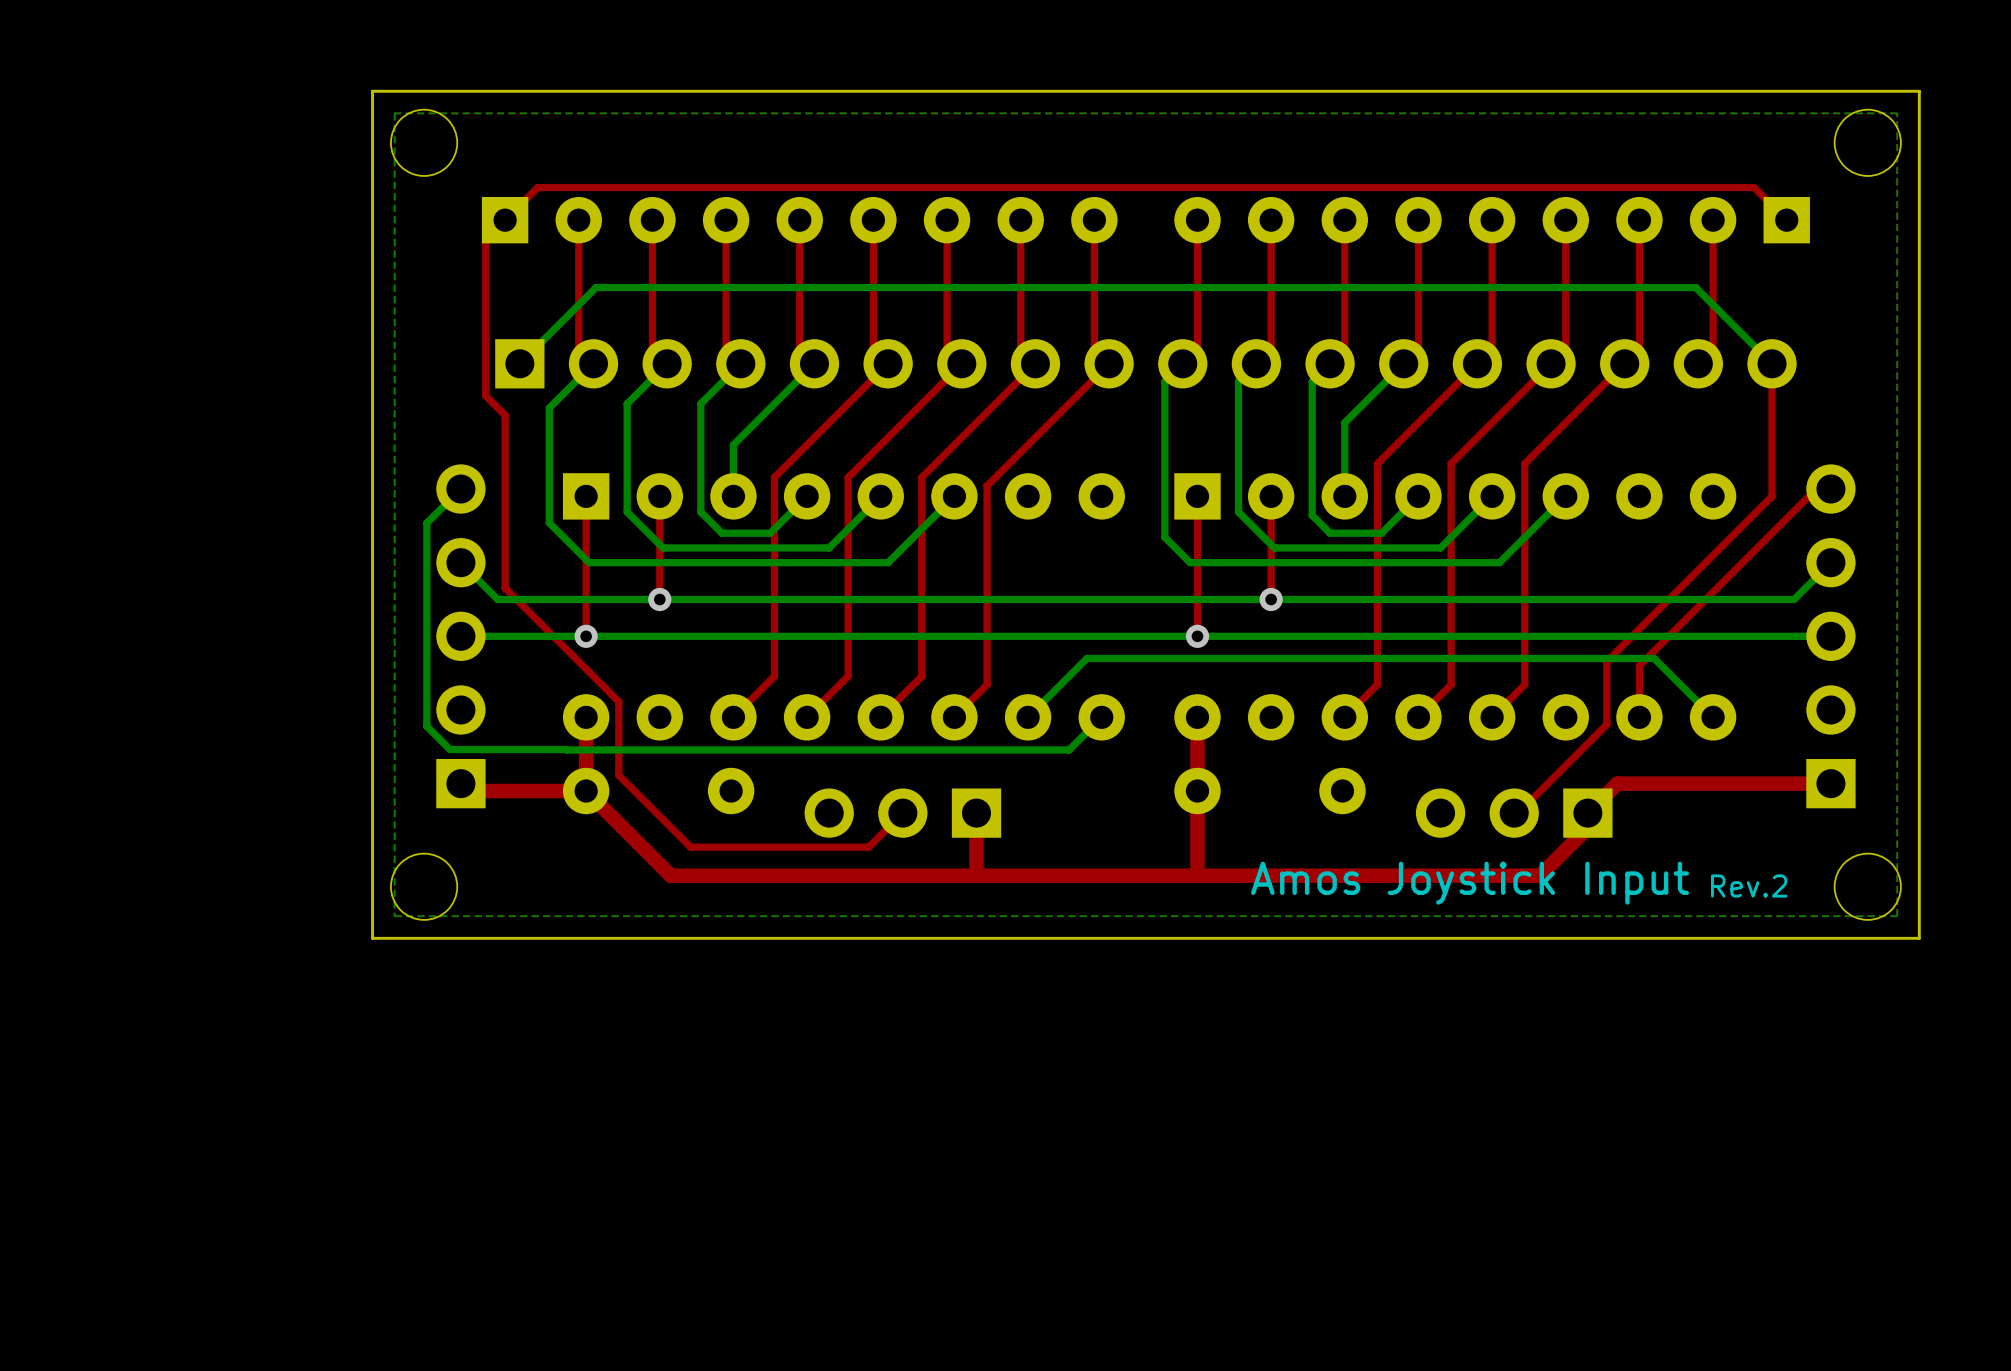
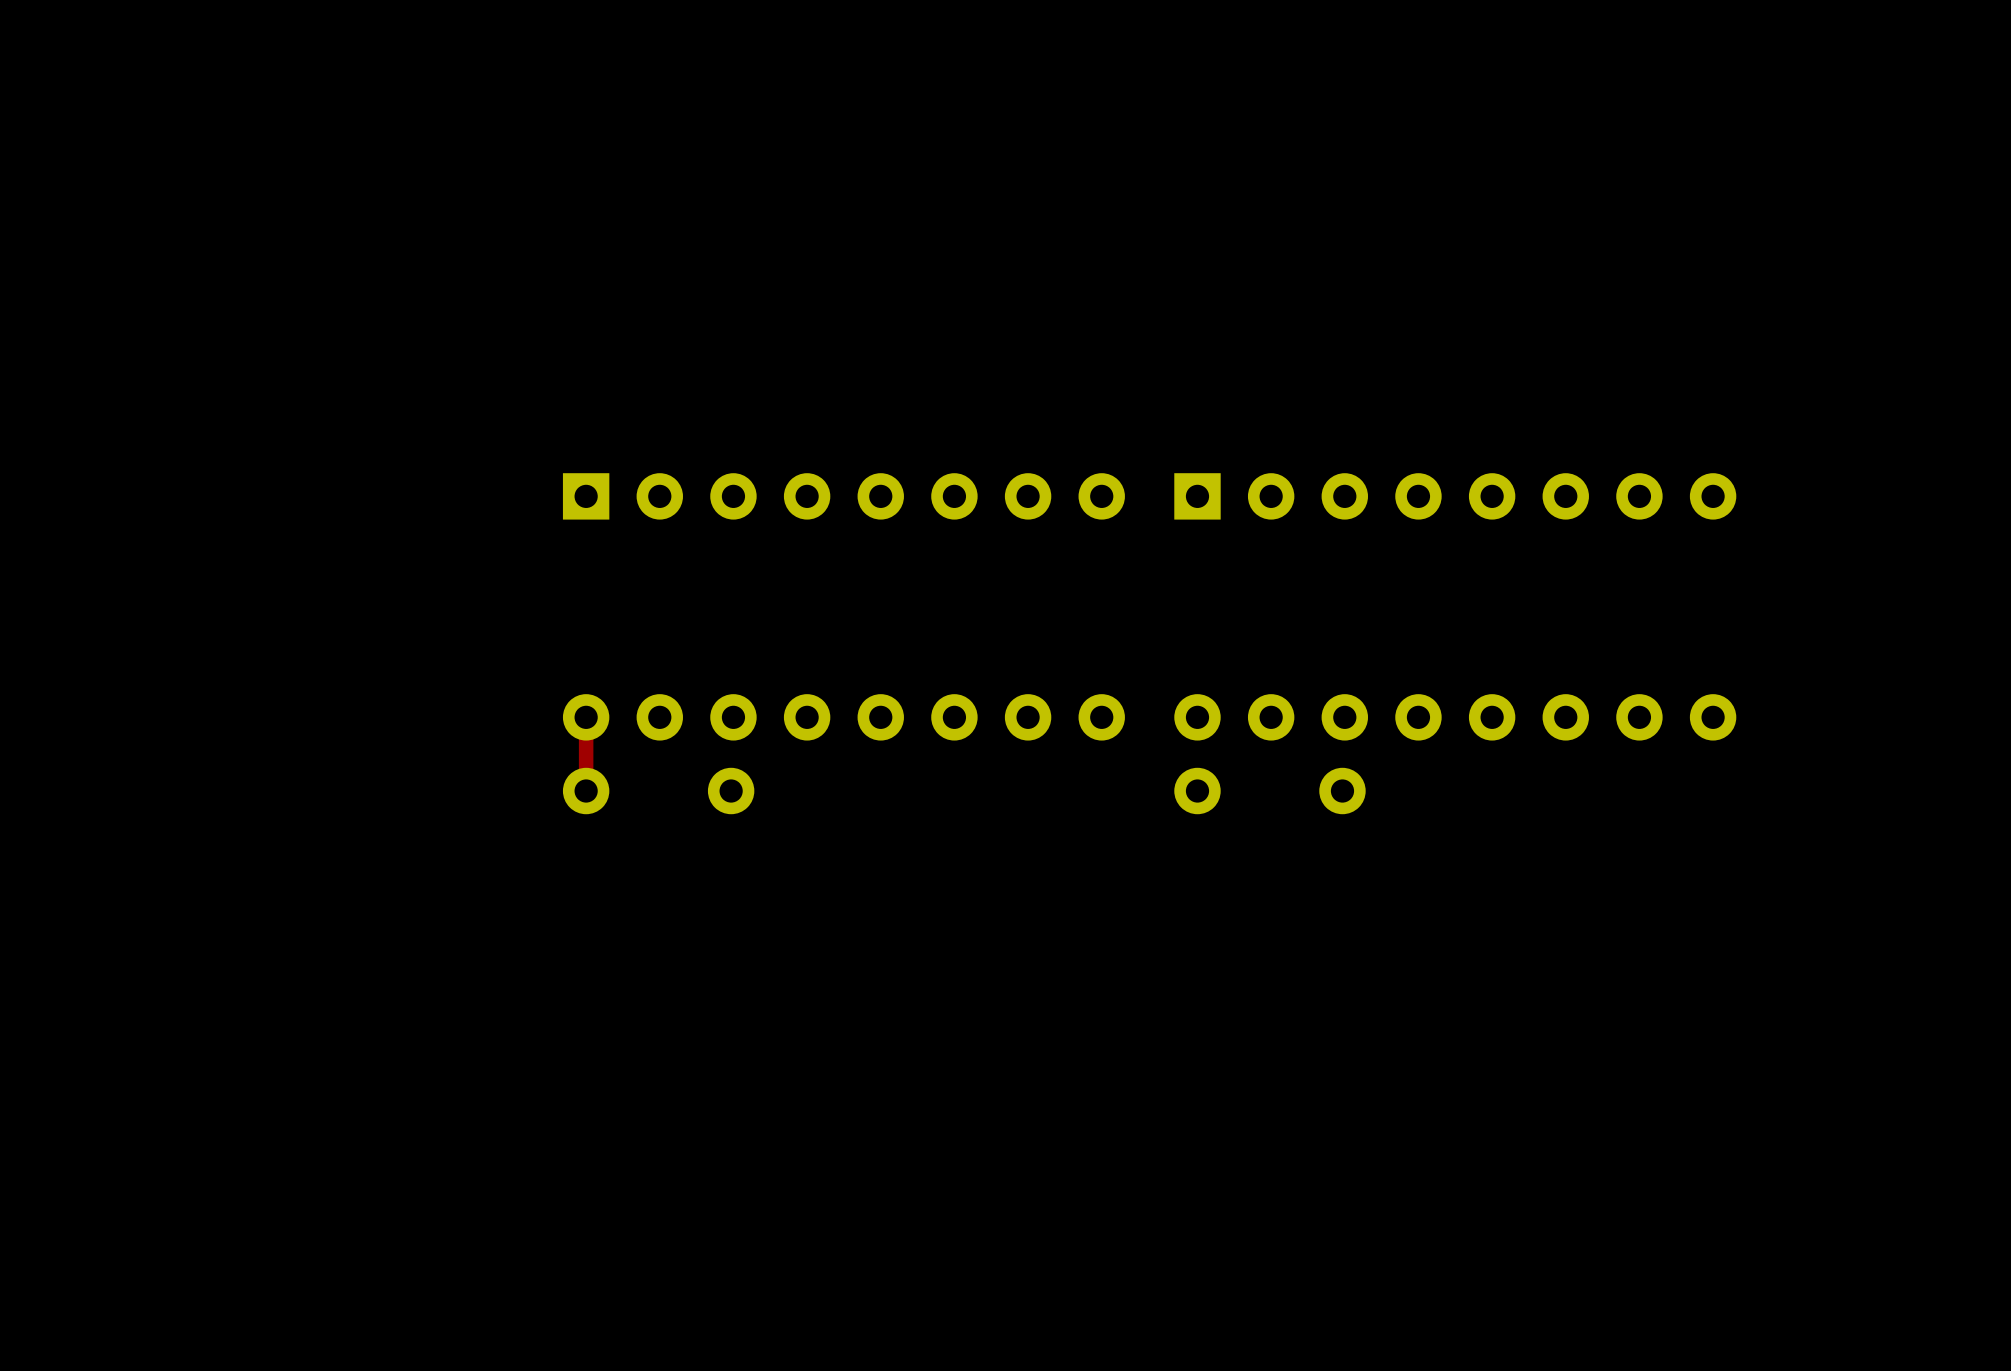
board edge: (1919, 91) (372, 91) (372, 938) (1919, 938) (1919, 91) -> none
round board edge: [390, 108, 458, 177] -> none
round board edge: [1833, 108, 1902, 177] -> none
bottom zone outline: (1897, 113) (1897, 916) (394, 916) (394, 113) (1897, 113) -> none
top track: (578, 220) (578, 349) (593, 363) -> none
top track: (652, 220) (652, 349) (667, 363) -> none
top track: (726, 220) (726, 349) (740, 363) -> none
top track: (799, 220) (799, 349) (814, 363) -> none
part: (799, 220) -> none
top track: (873, 220) (873, 349) (888, 363) (774, 477) (774, 676) (733, 717) -> none
top track: (947, 220) (947, 349) (961, 363) (848, 477) (848, 676) (807, 717) -> none
top track: (1020, 220) (1020, 349) (1035, 363) (921, 477) (921, 676) (880, 717) -> none
top track: (1094, 220) (1094, 349) (1109, 363) (987, 485) (987, 684) (954, 717) -> none
top track: (1197, 220) (1197, 349) (1182, 363) -> none
top track: (1271, 220) (1271, 349) (1256, 363) -> none
top track: (1344, 220) (1344, 349) (1330, 363) -> none
top track: (1418, 220) (1418, 349) (1403, 363) -> none
top track: (1492, 220) (1492, 349) (1377, 463) (1377, 684) (1344, 717) -> none
part: (1492, 220) -> none
top track: (1565, 220) (1565, 349) (1451, 463) (1451, 684) (1418, 717) -> none
top track: (1639, 220) (1639, 349) (1524, 463) (1524, 684) (1492, 717) -> none
top track: (1713, 220) (1713, 349) (1698, 363) -> none
top track: (1786, 220) (1754, 187) (537, 187) (485, 239) (485, 395) (505, 415) (505, 588) (618, 701) (618, 775) (690, 847) (868, 847) (902, 813) -> none
bottom track: (593, 363) (549, 407) (549, 522) (589, 562) (888, 562) (954, 496) -> none
bottom track: (667, 363) (627, 403) (627, 512) (663, 547) (829, 547) (880, 496) -> none
bottom track: (740, 363) (700, 403) (700, 512) (721, 533) (770, 533) (807, 496) -> none
bottom track: (814, 363) (733, 444) (733, 496) -> none
part: (1145, 363) -> none
bottom track: (1182, 363) (1164, 381) (1164, 537) (1190, 562) (1499, 562) (1565, 496) -> none
bottom track: (1256, 363) (1238, 381) (1238, 512) (1274, 547) (1440, 547) (1492, 496) -> none
bottom track: (1330, 363) (1312, 381) (1312, 515) (1330, 533) (1381, 533) (1418, 496) -> none
bottom track: (1403, 363) (1344, 422) (1344, 496) -> none
top track: (1772, 363) (1772, 496) (1606, 661) (1606, 724) (1518, 813) (1514, 813) -> none
bottom track: (1772, 363) (1695, 287) (596, 287) (519, 363) -> none
bottom track: (460, 489) (426, 523) (426, 726) (450, 749) (566, 749) -> none
top track: (1830, 489) (1816, 489) (1639, 665) (1639, 717) -> none
top track: (586, 496) (586, 636) -> none
top track: (659, 496) (659, 599) -> none
top track: (1197, 496) (1197, 636) -> none
top track: (1271, 496) (1271, 599) -> none
bottom track: (1830, 562) (1794, 599) (497, 599) (460, 562) -> none
via: (659, 599) -> none
via: (1271, 599) -> none
part: (460, 636) -> none
via: (586, 636) -> none
via: (1197, 636) -> none
bottom track: (1830, 636) (460, 636) -> none
part: (1830, 636) -> none
bottom track: (1101, 717) (1069, 749) (567, 749) -> none
top track: (1197, 717) (1197, 872) (1193, 875) -> none
bottom track: (1713, 717) (1654, 658) (1087, 658) (1028, 717) -> none
top track: (1830, 783) (1617, 783) (1587, 813) (1587, 827) (1539, 875) (670, 875) (586, 791) (468, 791) (460, 783) -> none
part: (902, 813) -> none
top track: (976, 813) (976, 872) (972, 875) -> none
part: (1514, 813) -> none
round board edge: [390, 852, 458, 921] -> none
round board edge: [1833, 852, 1902, 921] -> none
text: Amos Joystick Input (1470, 883) -> none
text: Rev.2 (1749, 886) -> none

